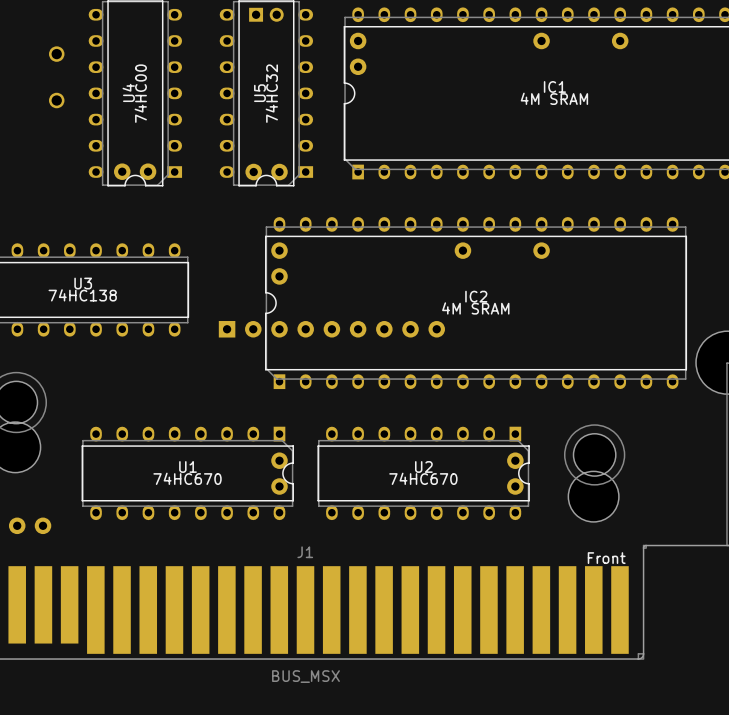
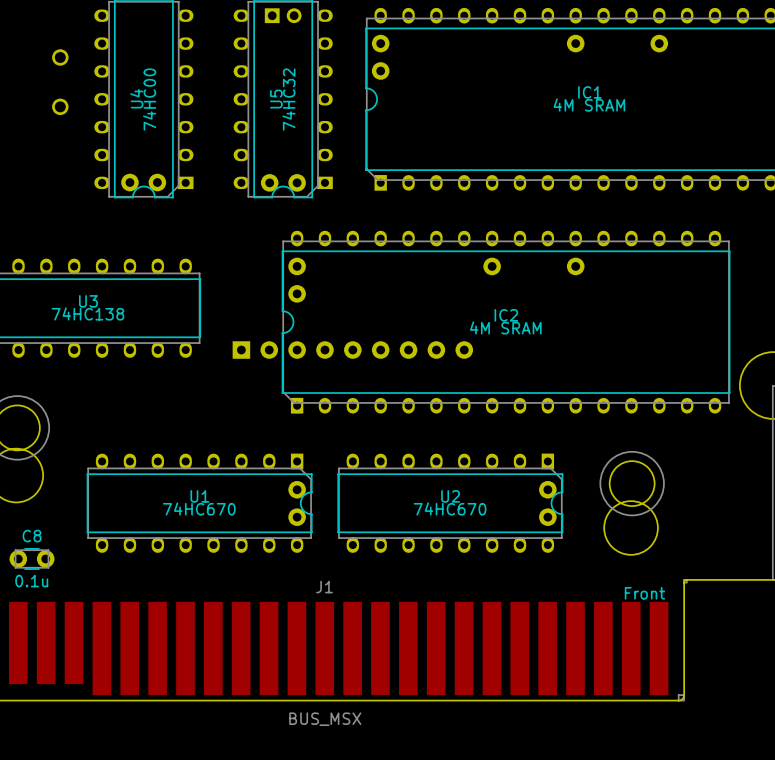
C8 side: bottom (30, 525) -> top (32, 558)

